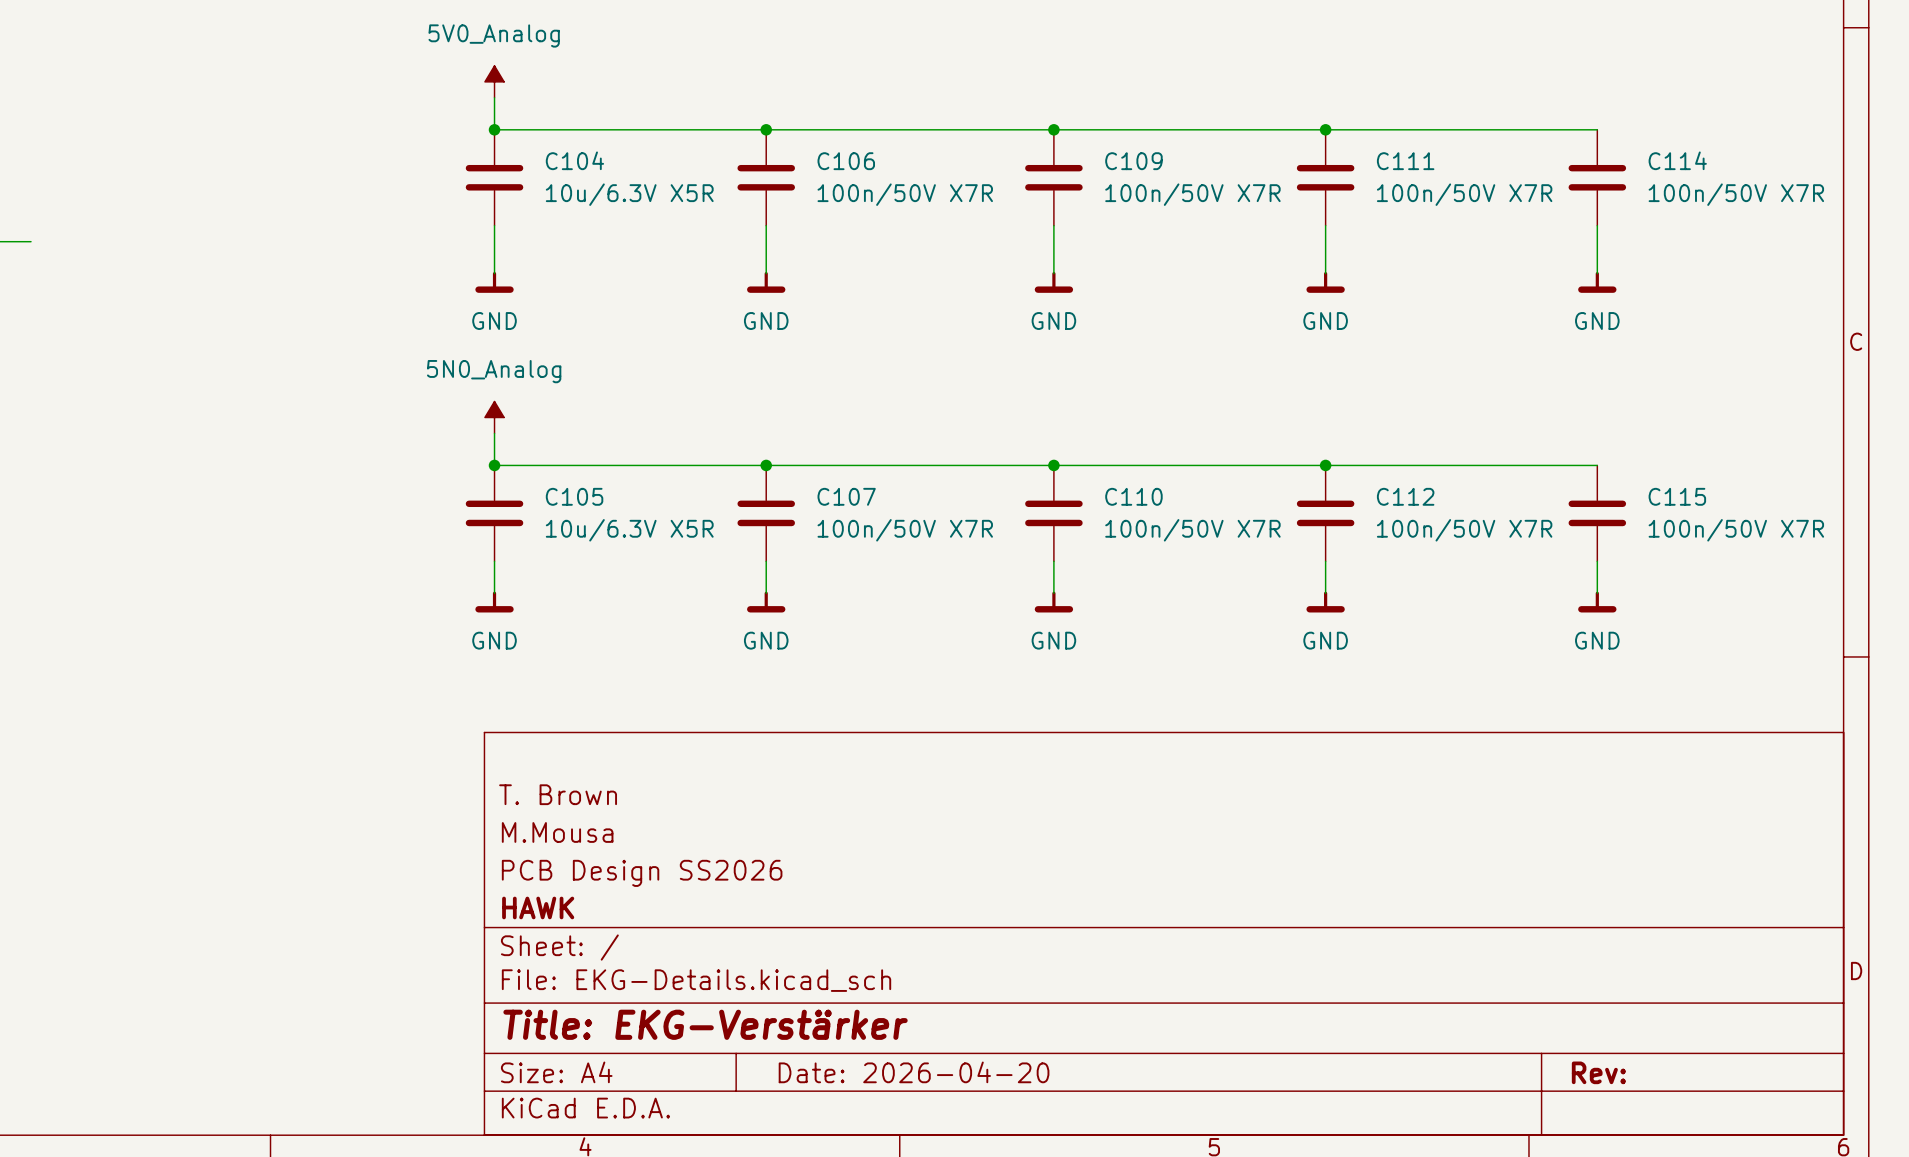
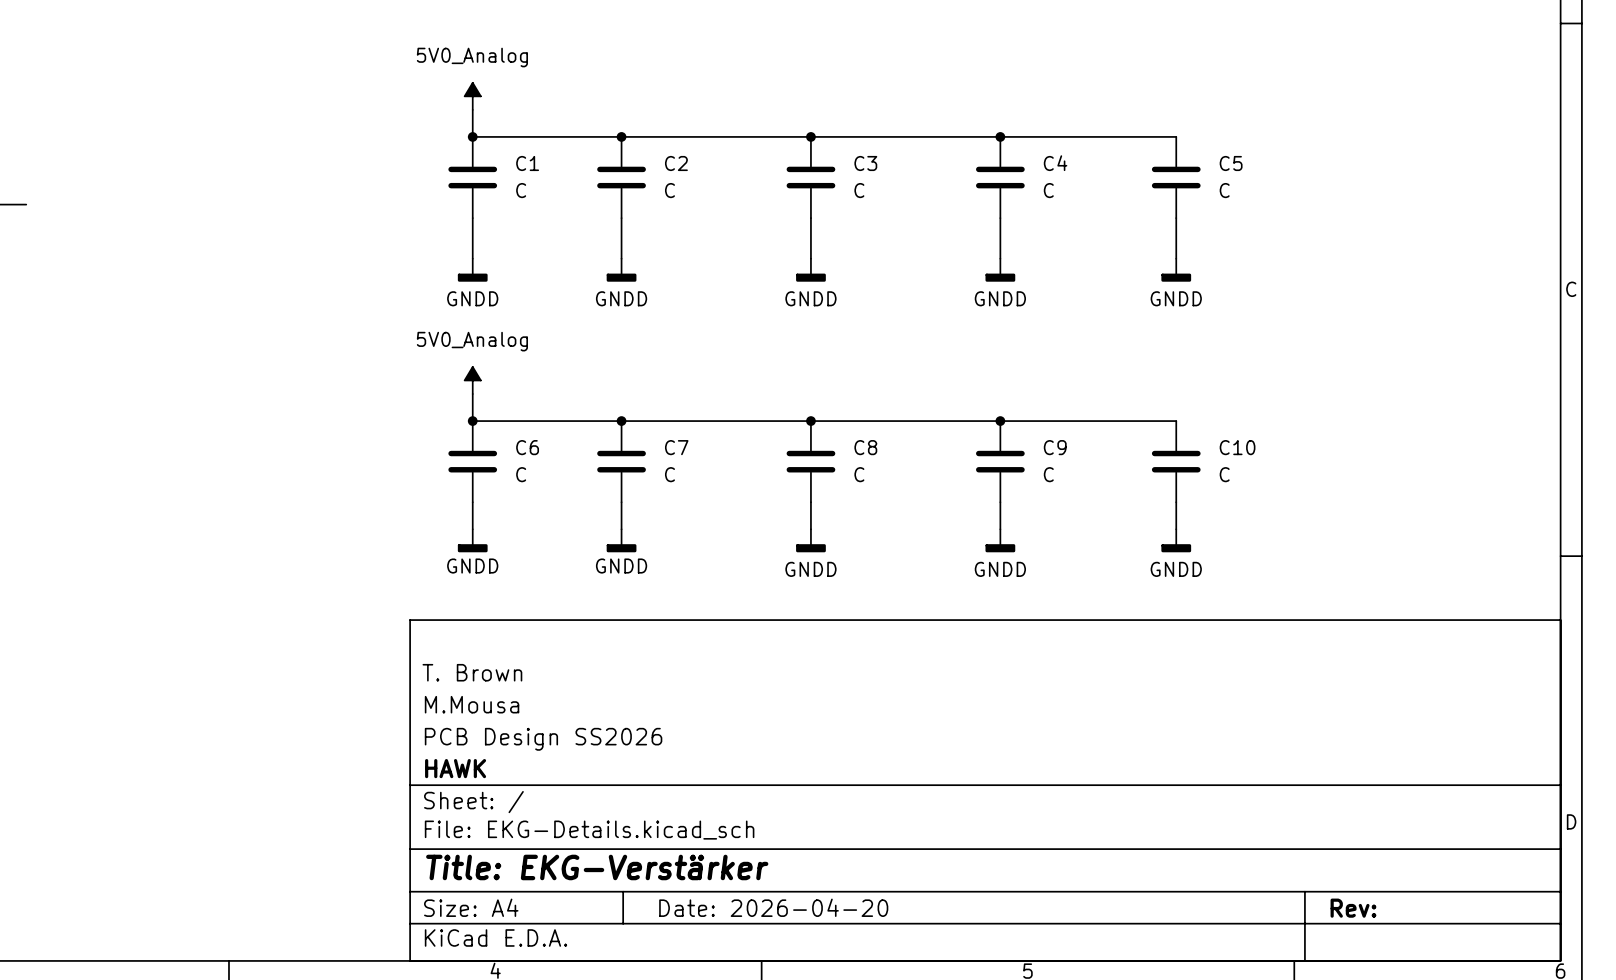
power symbol position: 5V0_Analog (494, 81) -> 5V0_Analog (472, 96)
wire: (494, 97) (494, 129) (1597, 129) -> none
junction position: (494, 129) -> (472, 136)
wire: none -> (472, 109) (472, 136) (1176, 136)
junction position: (766, 129) -> (621, 136)
junction: (1053, 129) -> none
junction: (1325, 129) -> none
junction: none -> (810, 136)
junction: none -> (1000, 136)
C104: 10u/6.3V X5R (494, 177) -> none
C106: 100n/50V X7R (766, 177) -> none
C109: 100n/50V X7R (1053, 177) -> none
C111: 100n/50V X7R (1325, 177) -> none
C114: 100n/50V X7R (1597, 177) -> none
C1: none -> C (472, 177)
C2: none -> C (621, 177)
C3: none -> C (810, 177)
C4: none -> C (1000, 177)
C5: none -> C (1176, 177)
wire: (494, 225) (494, 273) -> (472, 218) (472, 258)
wire: (766, 225) (766, 273) -> (621, 218) (621, 258)
wire: (1053, 225) (1053, 273) -> (810, 218) (810, 258)
wire: (1325, 225) (1325, 273) -> (1176, 218) (1176, 258)
wire: (1597, 225) (1597, 273) -> none
wire: none -> (1000, 218) (1000, 258)
power symbol: GND (494, 282) -> none
power symbol: GND (766, 282) -> none
power symbol: GND (1053, 282) -> none
power symbol: GND (1325, 282) -> none
power symbol: GND (1597, 282) -> none
power symbol: none -> GNDD (472, 270)
power symbol: none -> GNDD (621, 270)
power symbol: none -> GNDD (810, 270)
power symbol: none -> GNDD (1000, 270)
power symbol: none -> GNDD (1176, 270)
power symbol: 5N0_Analog (494, 417) -> none
wire: (494, 433) (494, 465) (1597, 465) -> none
power symbol: none -> 5V0_Analog (472, 380)
junction position: (494, 465) -> (472, 421)
wire: none -> (472, 394) (472, 421) (1176, 421)
junction position: (766, 465) -> (621, 421)
junction: (1053, 465) -> none
junction: (1325, 465) -> none
junction: none -> (810, 421)
junction: none -> (1000, 421)
C105: 10u/6.3V X5R (494, 513) -> none
C107: 100n/50V X7R (766, 513) -> none
C110: 100n/50V X7R (1053, 513) -> none
C112: 100n/50V X7R (1325, 513) -> none
C115: 100n/50V X7R (1597, 513) -> none
C6: none -> C (472, 461)
C7: none -> C (621, 461)
C8: none -> C (810, 461)
C9: none -> C (1000, 461)
C10: none -> C (1176, 461)
wire: (494, 561) (494, 593) -> (472, 502) (472, 529)
wire: (766, 561) (766, 593) -> (621, 502) (621, 529)
wire: (1053, 561) (1053, 593) -> (810, 502) (810, 529)
wire: (1325, 561) (1325, 593) -> (1176, 502) (1176, 529)
wire: (1597, 561) (1597, 593) -> none
wire: none -> (1000, 502) (1000, 529)
power symbol: GND (494, 602) -> none
power symbol: GND (766, 602) -> none
power symbol: GND (1053, 602) -> none
power symbol: GND (1325, 602) -> none
power symbol: GND (1597, 602) -> none
power symbol: none -> GNDD (472, 540)
power symbol: none -> GNDD (621, 540)
power symbol: none -> GNDD (810, 540)
power symbol: none -> GNDD (1000, 540)
power symbol: none -> GNDD (1176, 540)

